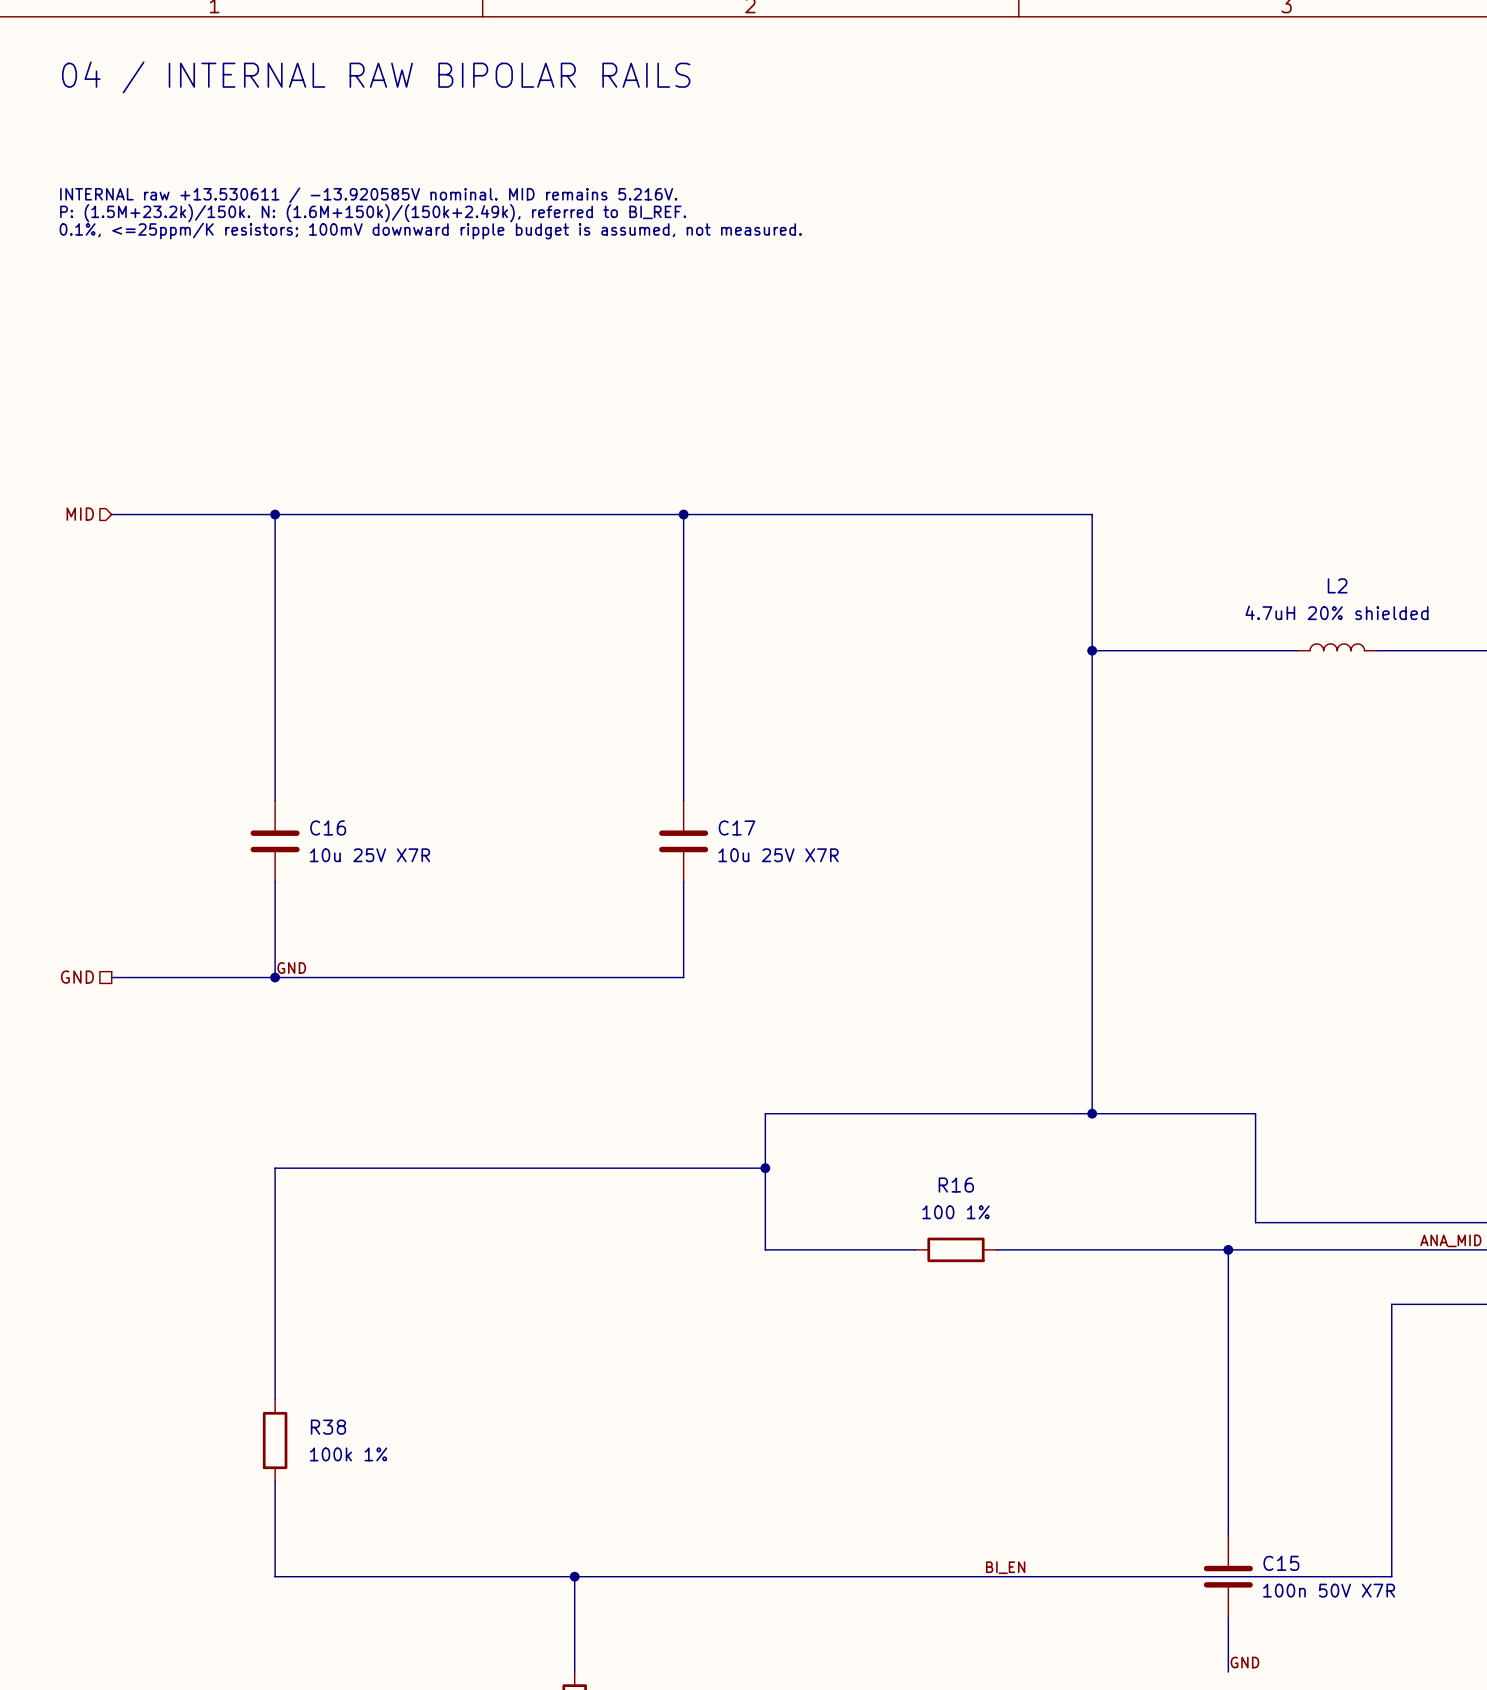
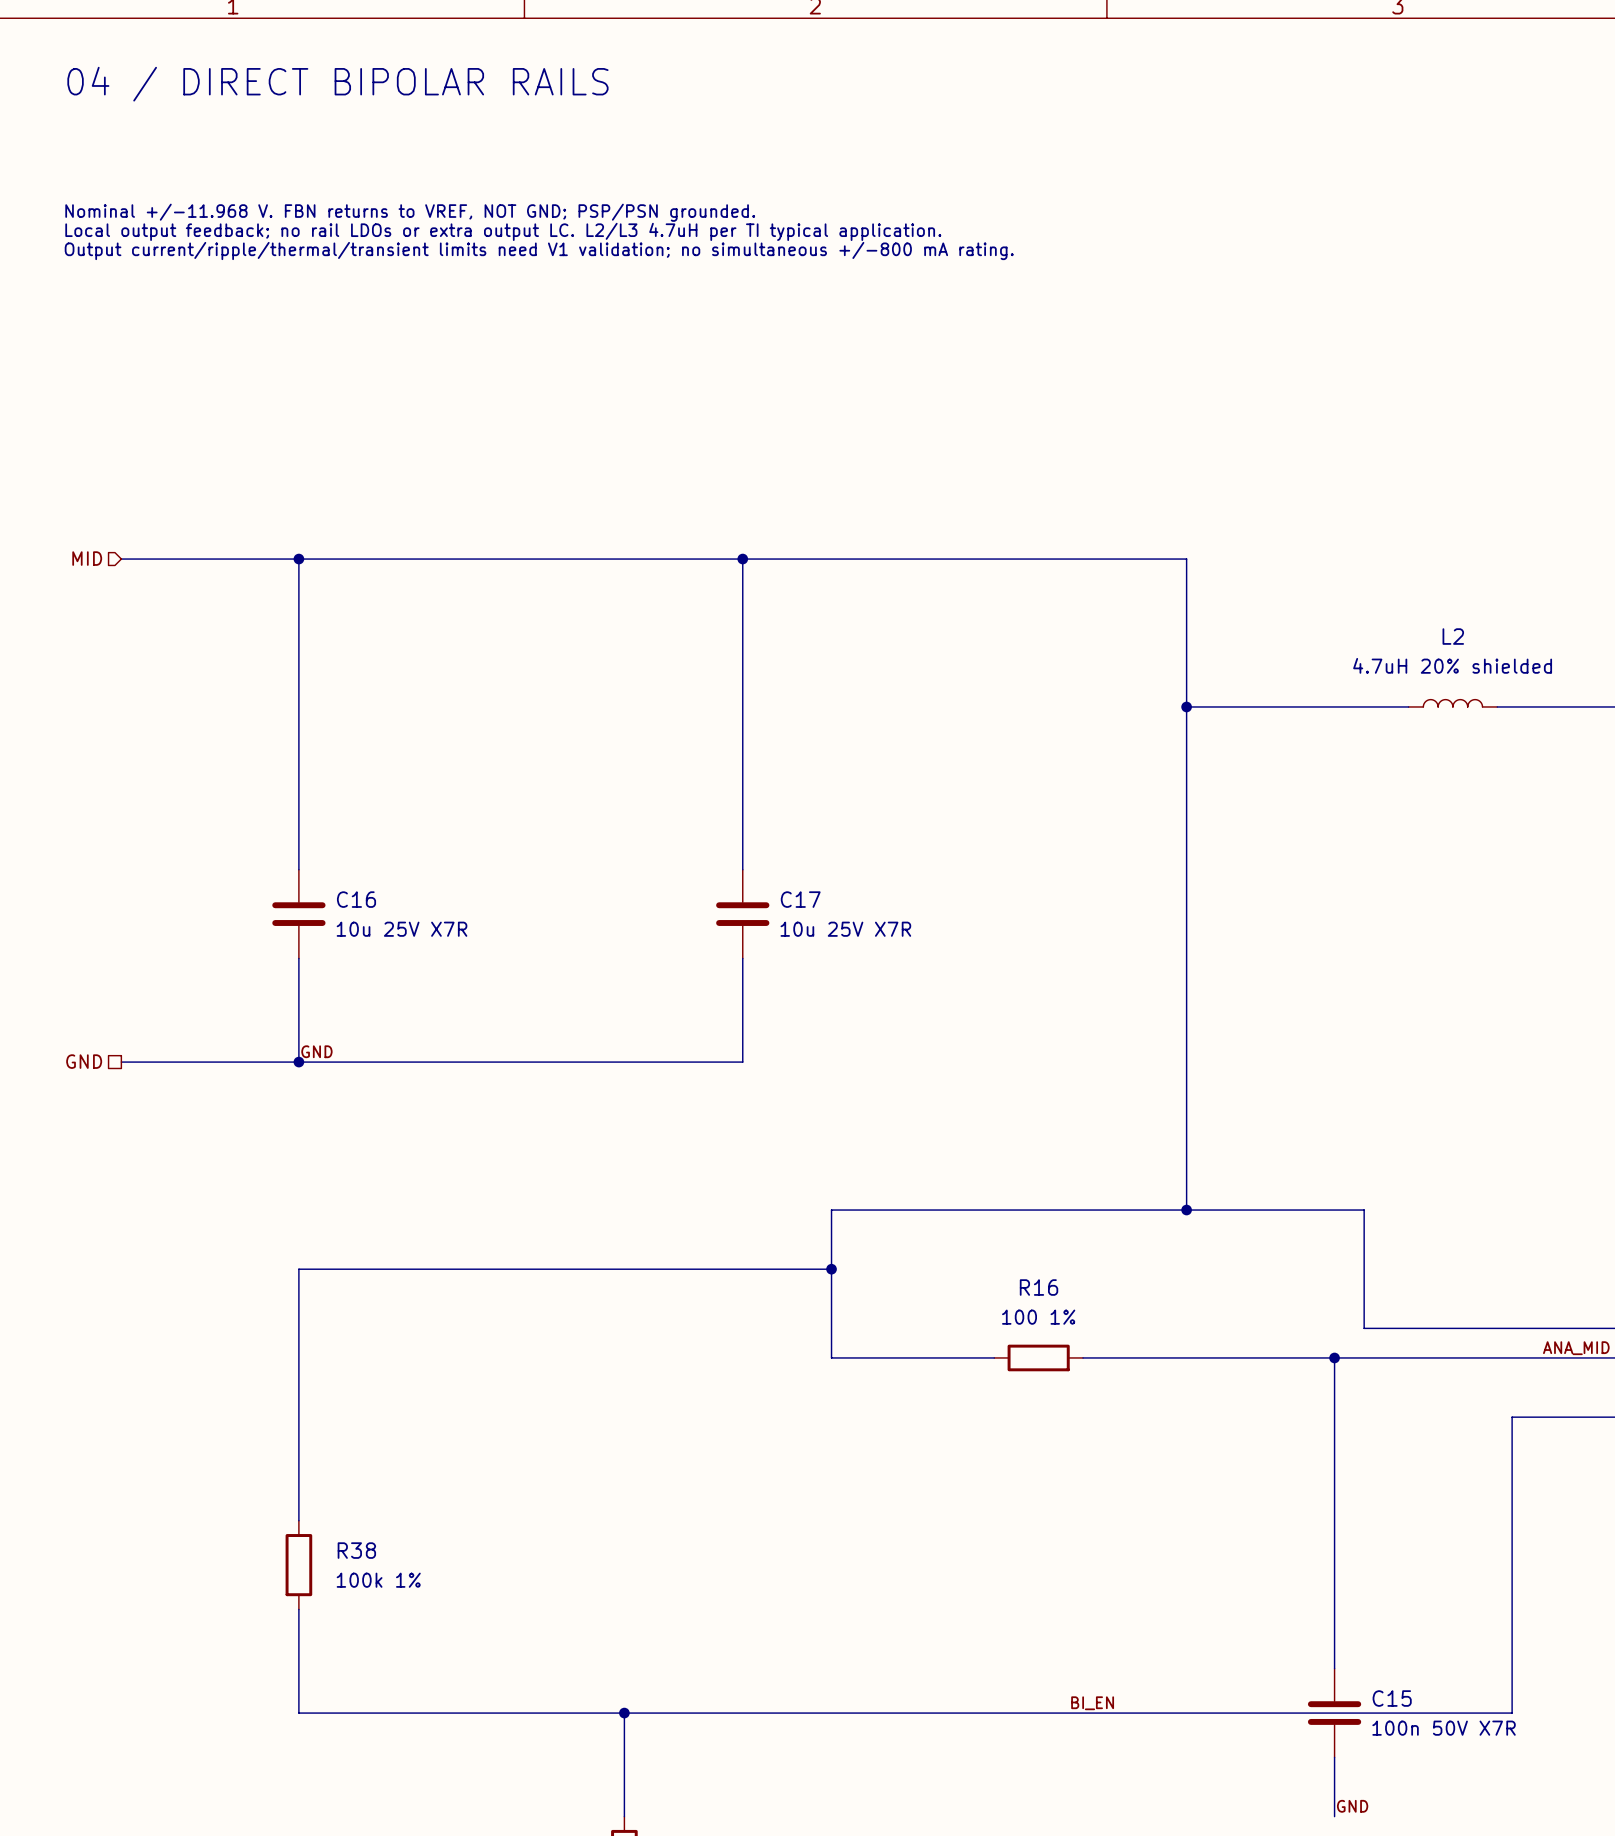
text: 04 / INTERNAL RAW BIPOLAR RAILS (376, 77) -> 04 / DIRECT BIPOLAR RAILS (337, 84)
text: INTERNAL raw +13.530611 / -13.920585V nominal. MID remains 5.216V. (368, 195) -> Nominal +/-11.968 V. FBN returns to VREF, NOT GND; PSP/PSN grounded. (410, 212)
text: P: (1.5M+23.2k)/150k. N: (1.6M+150k)/(150k+2.49k), referred to BI_REF. (373, 213) -> Local output feedback; no rail LDOs or extra output LC. L2/L3 4.7uH per TI typical application. (503, 231)
text: 0.1%, <=25ppm/K resistors; 100mV downward ripple budget is assumed, not measured. (430, 231) -> Output current/ripple/thermal/transient limits need V1 validation; no simultaneous +/-800 mA rating. (539, 251)

